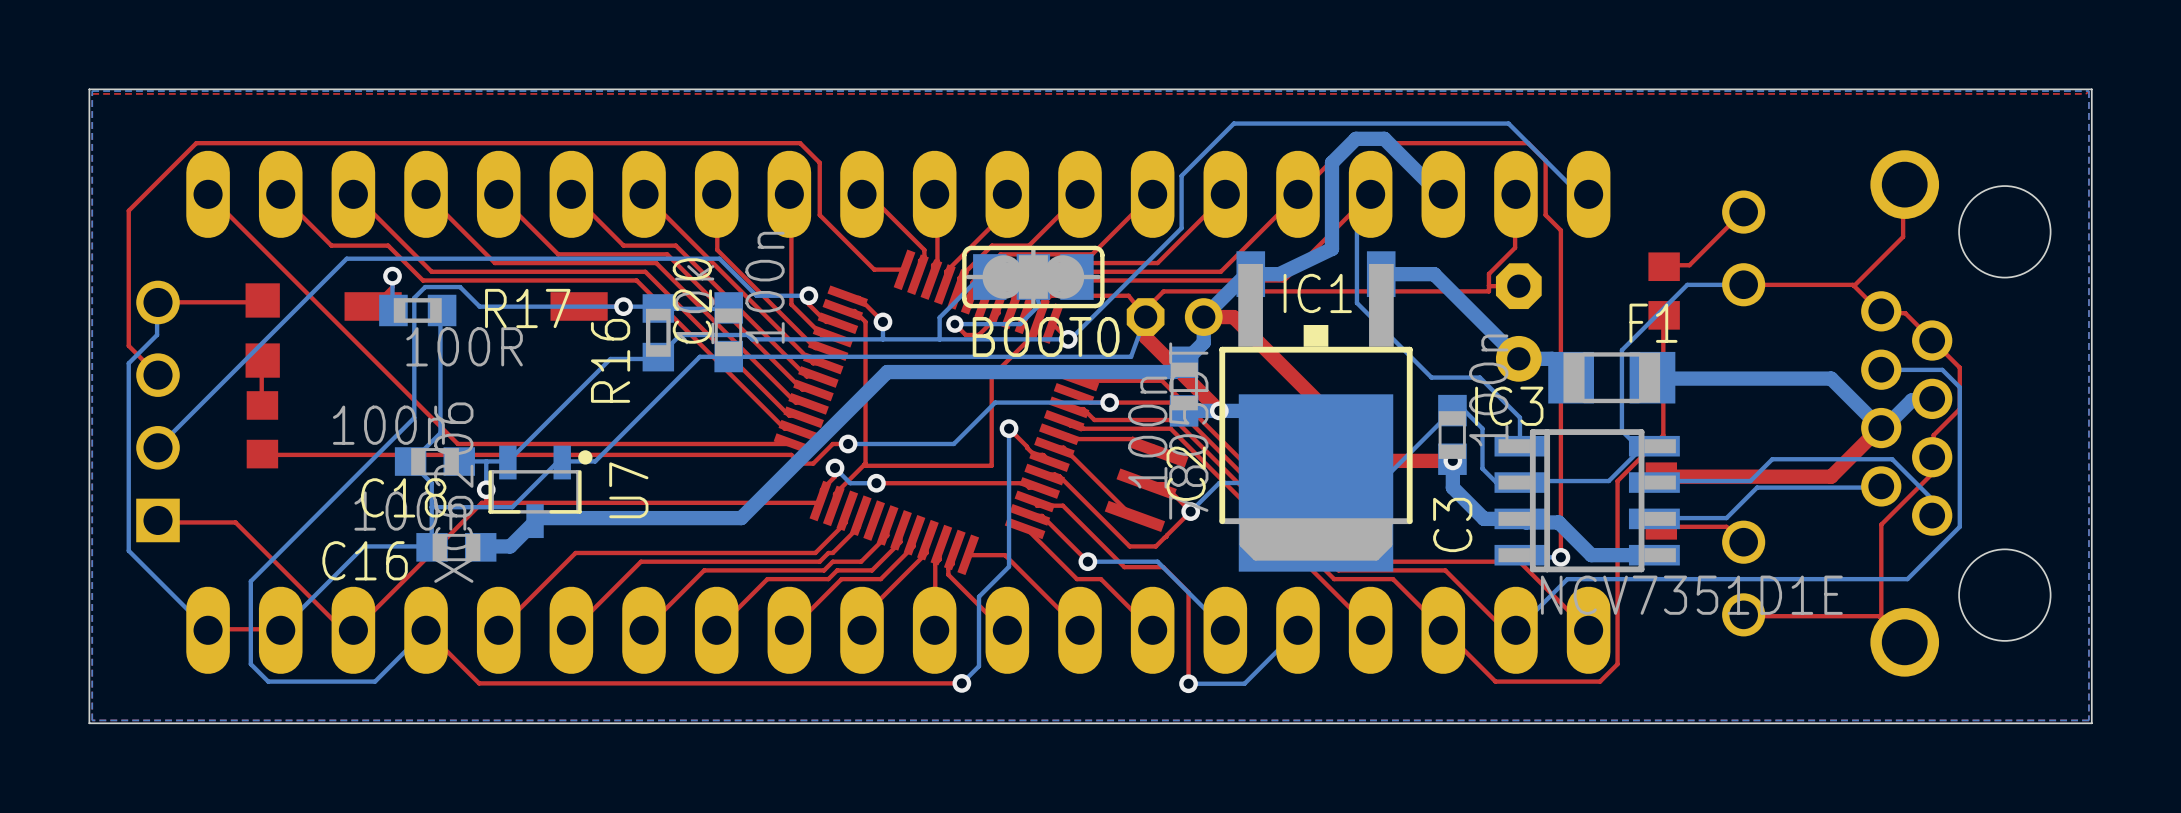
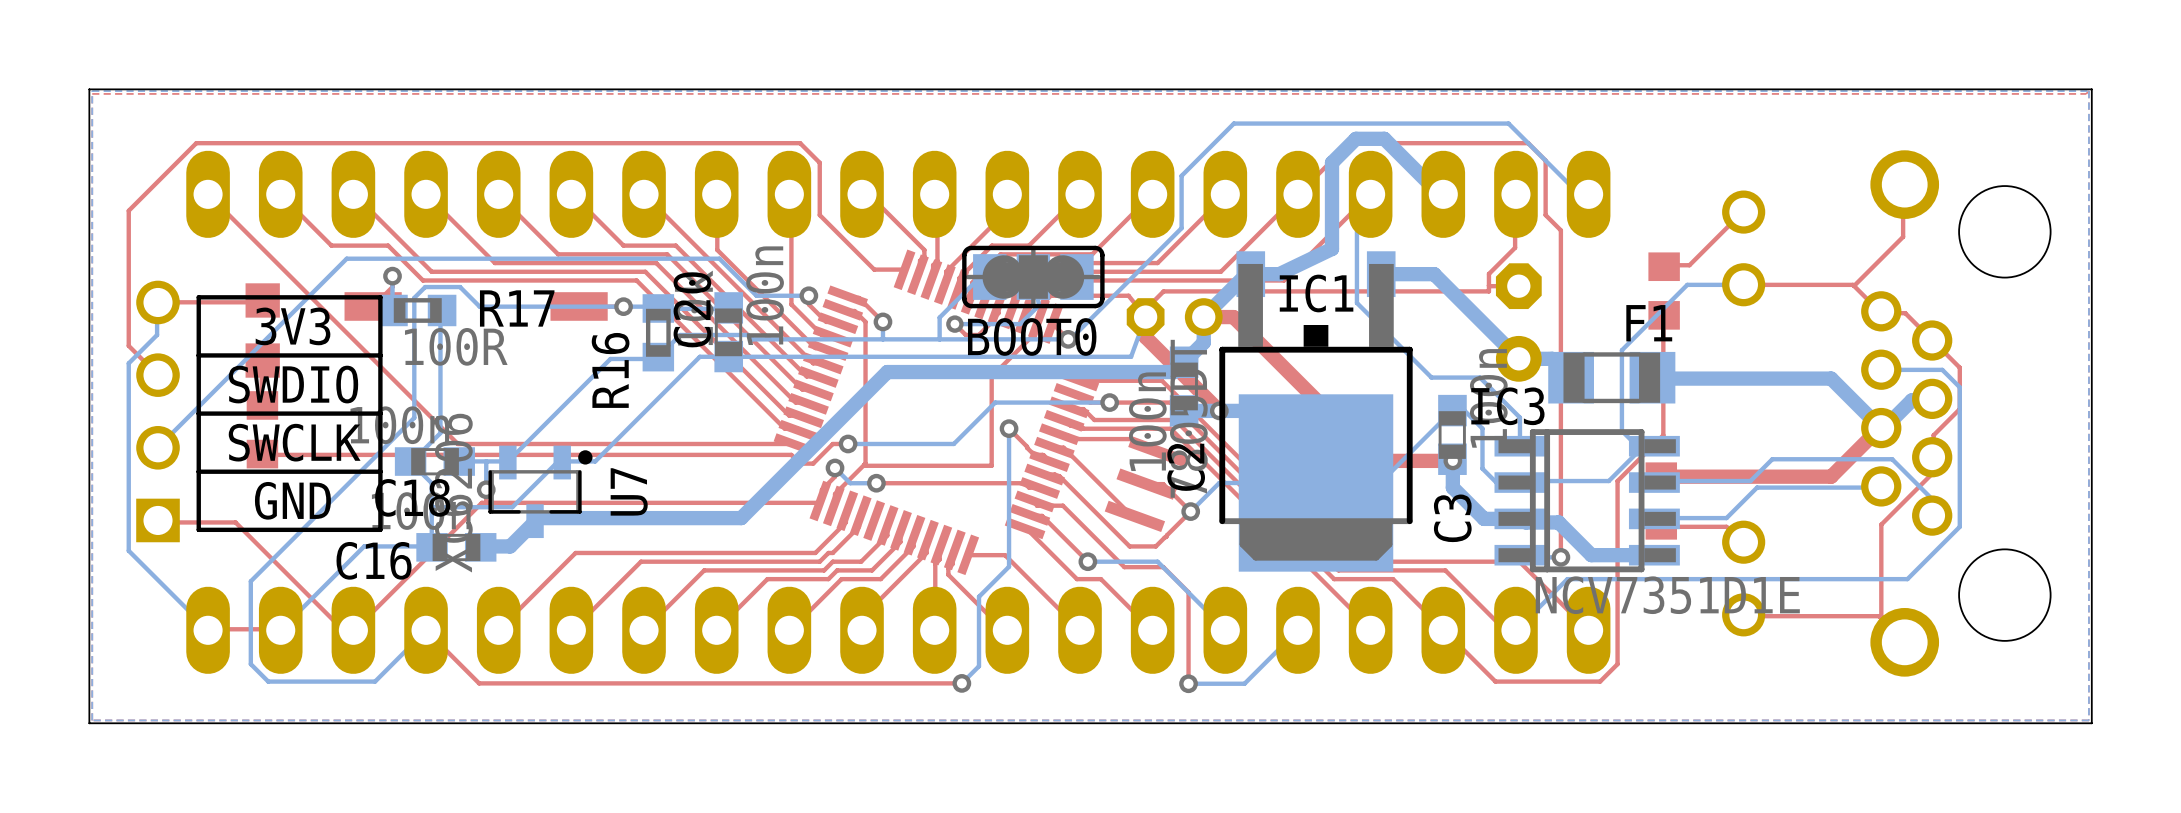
line: none -> (380, 297) (198, 297) (198, 529) (380, 529) (380, 297)
text: none -> 3V3 (293, 326)
line: none -> (380, 355) (198, 355)
text: none -> SWDIO (293, 384)
line: none -> (380, 413) (198, 413)
text: none -> SWCLK (294, 442)
line: none -> (380, 471) (198, 471)
text: none -> GND (292, 500)

